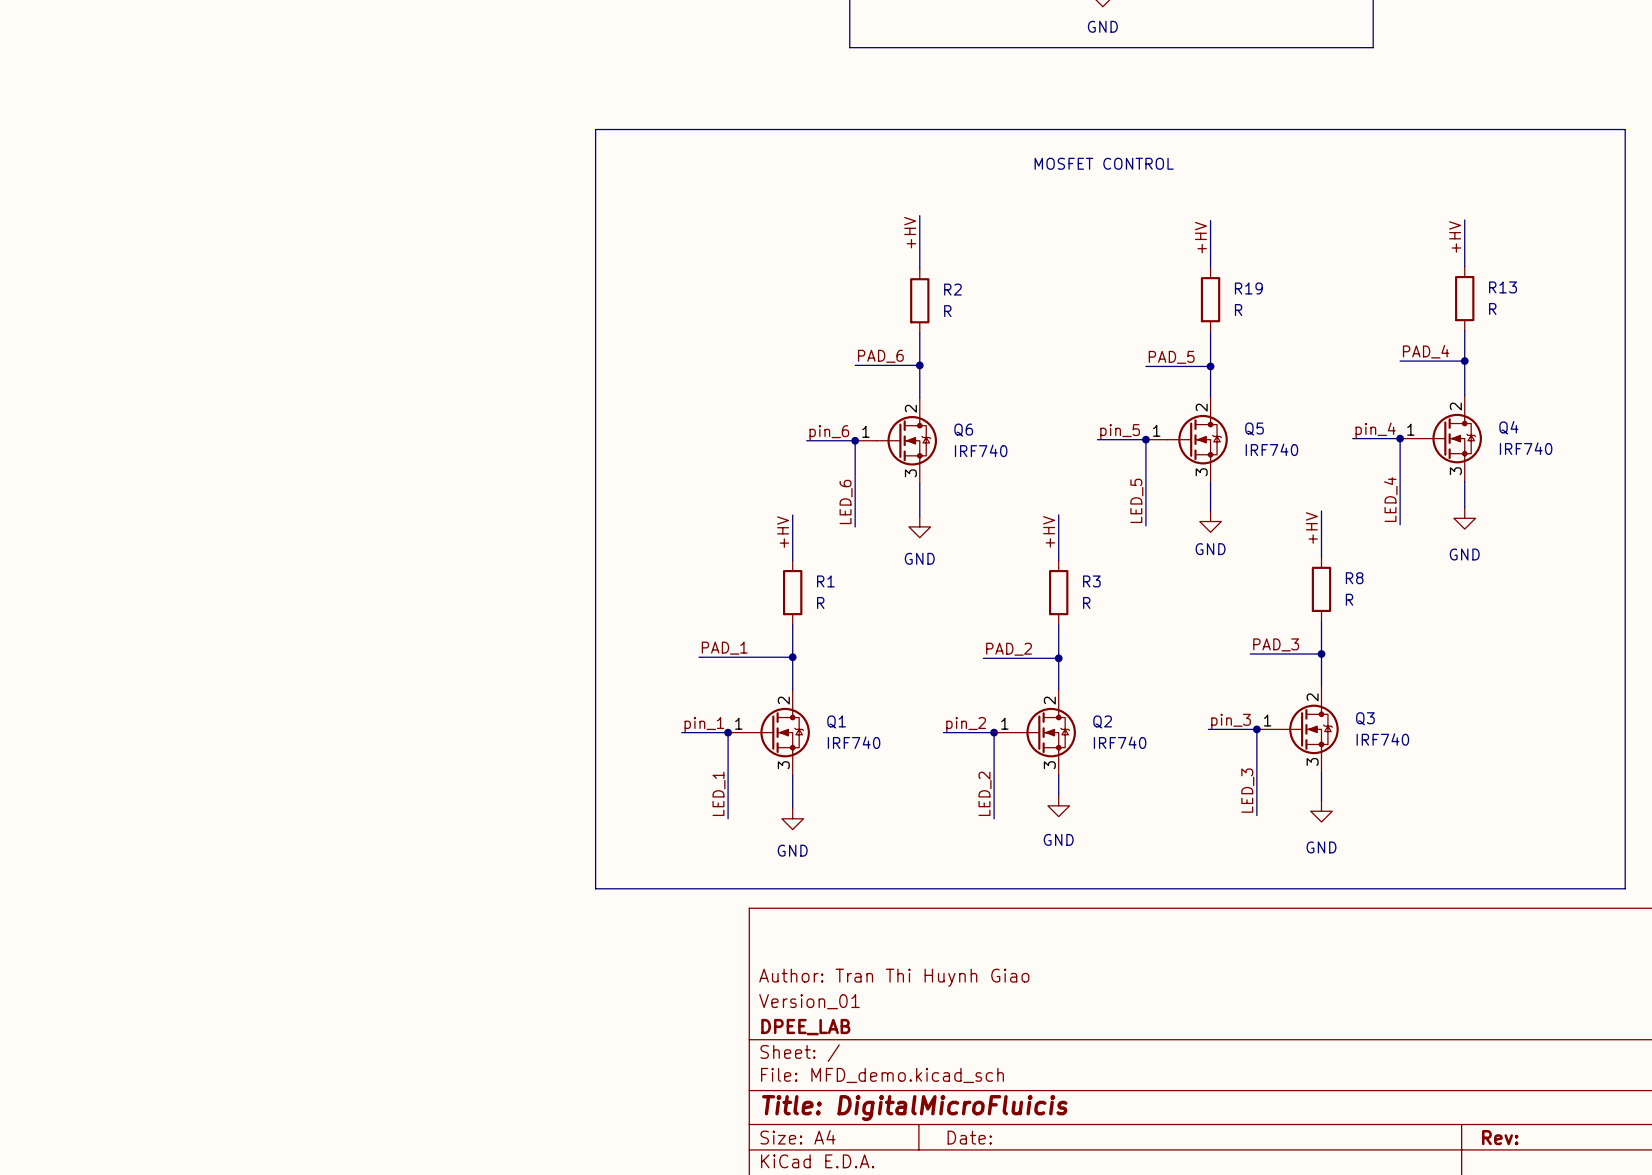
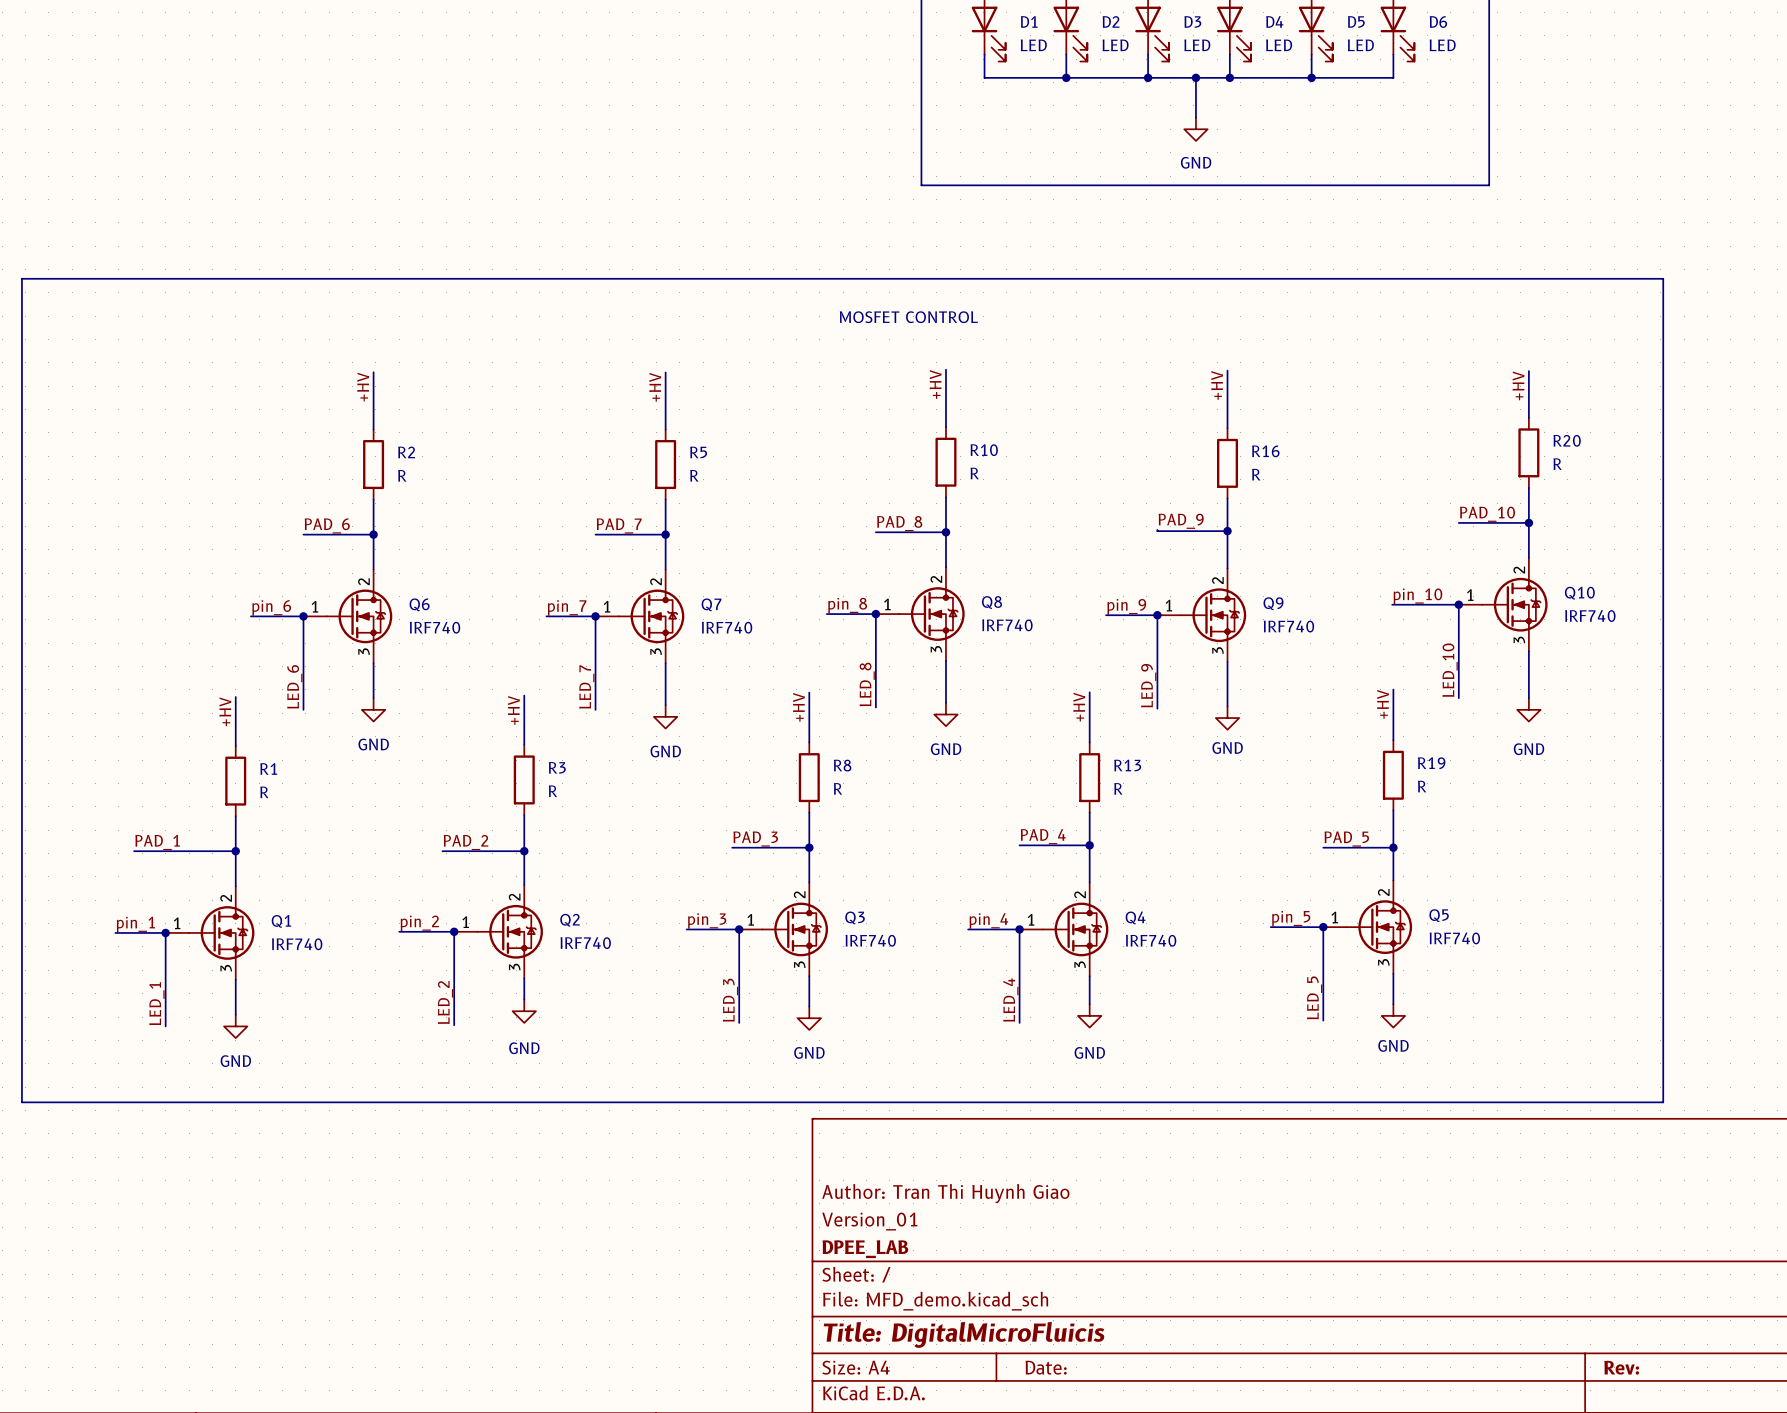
line: (595, 129) (1625, 129) (1625, 888) (595, 888) (595, 129) -> (21, 278) (21, 1102) (1663, 1102) (1663, 278) (21, 278)
text: MOSFET CONTROL (1104, 163) -> none
text: none -> MOSFET CONTROL (908, 317)
wire: (919, 215) (919, 268) -> none
wire: none -> (945, 369) (945, 427)
wire: none -> (1227, 370) (1227, 428)
wire: none -> (1528, 371) (1528, 417)
wire: none -> (373, 372) (373, 429)
wire: (1464, 219) (1464, 266) -> none
wire: none -> (665, 372) (665, 429)
wire: (1210, 220) (1210, 267) -> none
label position: +HV (910, 232) -> +HV (935, 384)
label: none -> +HV (363, 387)
label position: +HV (1455, 236) -> +HV (1518, 385)
label: none -> +HV (655, 387)
label position: +HV (1200, 237) -> +HV (1217, 385)
R20: none -> R (1528, 452)
R13 position: (1464, 298) -> (1089, 777)
R19 position: (1210, 299) -> (1393, 775)
R2 position: (919, 300) -> (373, 464)
R10: none -> R (945, 462)
R16: none -> R (1227, 463)
R5: none -> R (665, 464)
wire: (1464, 330) (1464, 395) -> (1528, 487) (1528, 557)
wire: (1210, 331) (1210, 396) -> (1227, 498) (1227, 568)
wire: (919, 333) (919, 397) -> (945, 497) (945, 567)
wire: none -> (373, 499) (373, 569)
wire: none -> (665, 499) (665, 569)
label: PAD_4 (1426, 351) -> PAD_10 (1487, 514)
label: PAD_6 (880, 356) -> PAD_8 (899, 523)
label: none -> PAD_9 (1181, 521)
label: PAD_5 (1171, 357) -> none
junction: none -> (1528, 522)
label: none -> PAD_6 (327, 525)
label: none -> PAD_7 (619, 525)
wire: (1400, 361) (1464, 361) -> (1458, 522) (1528, 522)
junction: (1464, 361) -> none
wire: (855, 365) (919, 365) -> (875, 532) (945, 532)
junction: (919, 365) -> none
wire: none -> (1157, 529) (1227, 531)
junction: none -> (1227, 531)
wire: (1145, 366) (1210, 366) -> none
junction: (1210, 366) -> none
junction: none -> (945, 532)
wire: none -> (303, 534) (373, 534)
junction: none -> (373, 534)
wire: none -> (595, 534) (665, 534)
junction: none -> (665, 534)
label: none -> pin_10 (1418, 596)
label: pin_4 (1375, 430) -> none
label: pin_5 (1120, 431) -> none
label: pin_6 (829, 432) -> pin_8 (847, 605)
wire: none -> (1392, 604) (1458, 604) (1458, 698)
junction: none -> (1458, 604)
Q10: none -> IRF740 (1503, 604)
label: none -> pin_9 (1126, 606)
label: none -> pin_6 (271, 607)
label: none -> pin_7 (567, 607)
wire: (1352, 438) (1400, 438) (1400, 524) -> none
junction: (1400, 438) -> none
Q4 position: (1441, 438) -> (1063, 929)
wire: (1097, 439) (1145, 439) (1145, 525) -> none
junction: (1145, 439) -> none
Q5 position: (1186, 439) -> (1367, 927)
wire: (806, 440) (855, 440) (855, 526) -> none
junction: (855, 440) -> none
Q6 position: (896, 440) -> (347, 616)
wire: none -> (826, 614) (875, 614) (875, 707)
junction: none -> (875, 614)
Q8: none -> IRF740 (920, 614)
wire: none -> (1106, 615) (1157, 615) (1157, 708)
junction: none -> (1157, 615)
Q9: none -> IRF740 (1201, 615)
wire: none -> (250, 616) (303, 616) (303, 709)
junction: none -> (303, 616)
wire: none -> (546, 616) (595, 616) (595, 709)
junction: none -> (595, 616)
Q7: none -> IRF740 (639, 616)
wire: none -> (1528, 651) (1528, 698)
wire: (1464, 481) (1464, 507) -> none
wire: (1210, 482) (1210, 510) -> none
wire: (919, 483) (919, 516) -> none
wire: none -> (945, 660) (945, 702)
wire: none -> (1227, 661) (1227, 706)
wire: none -> (373, 663) (373, 698)
wire: none -> (665, 663) (665, 705)
label: none -> LED_10 (1450, 670)
label: LED_4 (1390, 499) -> none
label: LED_5 (1136, 500) -> none
label: LED_6 (846, 501) -> none
label: none -> LED_8 (867, 684)
label: none -> LED_9 (1148, 685)
label: none -> LED_6 (294, 686)
label: none -> LED_7 (586, 686)
wire: (1321, 510) (1321, 557) -> none
wire: none -> (1393, 689) (1393, 740)
wire: (1058, 514) (1058, 560) -> none
wire: none -> (809, 692) (809, 742)
wire: (792, 515) (792, 560) -> none
wire: none -> (1089, 692) (1089, 742)
wire: none -> (524, 695) (524, 744)
power symbol position: GND (1464, 518) -> GND (1528, 709)
wire: none -> (235, 697) (235, 746)
power symbol position: GND (1210, 521) -> GND (1227, 718)
power symbol position: GND (919, 526) -> GND (945, 714)
label position: +HV (1311, 527) -> +HV (1383, 704)
power symbol: none -> GND (373, 709)
label position: +HV (1049, 531) -> +HV (1079, 707)
label position: +HV (783, 532) -> +HV (798, 707)
label: none -> +HV (513, 710)
label: none -> +HV (225, 711)
power symbol: none -> GND (665, 716)
R8 position: (1321, 589) -> (809, 777)
R1 position: (792, 592) -> (235, 781)
R3 position: (1058, 592) -> (524, 779)
wire: (1321, 621) (1321, 686) -> (1393, 810) (1393, 880)
wire: (792, 624) (792, 689) -> (809, 812) (809, 882)
wire: (1058, 624) (1058, 689) -> (1089, 812) (1089, 882)
wire: none -> (524, 814) (524, 885)
wire: none -> (235, 816) (235, 886)
label: PAD_3 (1276, 644) -> PAD_5 (1346, 839)
label: PAD_1 (724, 648) -> PAD_3 (755, 839)
label: PAD_2 (1009, 649) -> PAD_4 (1043, 836)
label: none -> PAD_1 (157, 842)
label: none -> PAD_2 (465, 842)
wire: (1250, 654) (1321, 654) -> none
junction position: (1321, 654) -> (1393, 847)
wire: none -> (1019, 845) (1089, 845)
junction: none -> (1089, 845)
wire: (698, 657) (792, 657) -> none
junction: (792, 657) -> none
wire: none -> (732, 847) (809, 847)
junction: none -> (809, 847)
wire: (983, 658) (1058, 658) -> none
junction: (1058, 658) -> none
wire: none -> (1323, 847) (1393, 847)
wire: none -> (134, 851) (235, 851)
junction: none -> (235, 851)
wire: none -> (442, 851) (524, 851)
junction: none -> (524, 851)
label: pin_3 (1231, 721) -> pin_5 (1291, 918)
label: pin_1 (704, 724) -> pin_3 (707, 921)
label: pin_2 (966, 724) -> pin_4 (988, 920)
label: none -> pin_2 (419, 923)
label: none -> pin_1 (135, 924)
wire: (1208, 729) (1256, 729) (1256, 815) -> (1270, 927) (1323, 927) (1323, 1020)
junction position: (1256, 729) -> (1323, 927)
Q3 position: (1297, 729) -> (783, 929)
wire: (681, 732) (728, 732) (728, 818) -> none
junction: (728, 732) -> none
Q1 position: (769, 732) -> (210, 932)
wire: (943, 732) (994, 732) (994, 818) -> none
junction: (994, 732) -> none
Q2 position: (1035, 732) -> (498, 931)
wire: none -> (686, 929) (739, 929) (739, 1022)
junction: none -> (739, 929)
wire: none -> (968, 929) (1019, 929) (1019, 1022)
junction: none -> (1019, 929)
wire: none -> (399, 931) (454, 931) (454, 1025)
junction: none -> (454, 931)
wire: none -> (115, 932) (165, 932) (165, 1026)
junction: none -> (165, 932)
wire: (1321, 772) (1321, 800) -> (1393, 973) (1393, 1004)
wire: (792, 775) (792, 808) -> none
wire: (1058, 775) (1058, 795) -> none
wire: none -> (809, 976) (809, 1006)
wire: none -> (1089, 976) (1089, 1004)
wire: none -> (524, 978) (524, 999)
wire: none -> (235, 979) (235, 1014)
label: LED_3 (1247, 790) -> none
label: none -> LED_5 (1314, 997)
label: LED_1 (718, 793) -> none
label: LED_2 (984, 793) -> none
label: none -> LED_3 (730, 1000)
label: none -> LED_4 (1010, 1000)
label: none -> LED_2 (445, 1002)
label: none -> LED_1 (156, 1003)
power symbol position: GND (1058, 805) -> GND (1089, 1015)
power symbol: none -> GND (524, 1011)
power symbol position: GND (1321, 811) -> GND (1393, 1015)
power symbol position: GND (792, 818) -> GND (809, 1018)
power symbol: none -> GND (235, 1026)
power symbol text position: GND (1321, 847) -> GND (1393, 1045)

